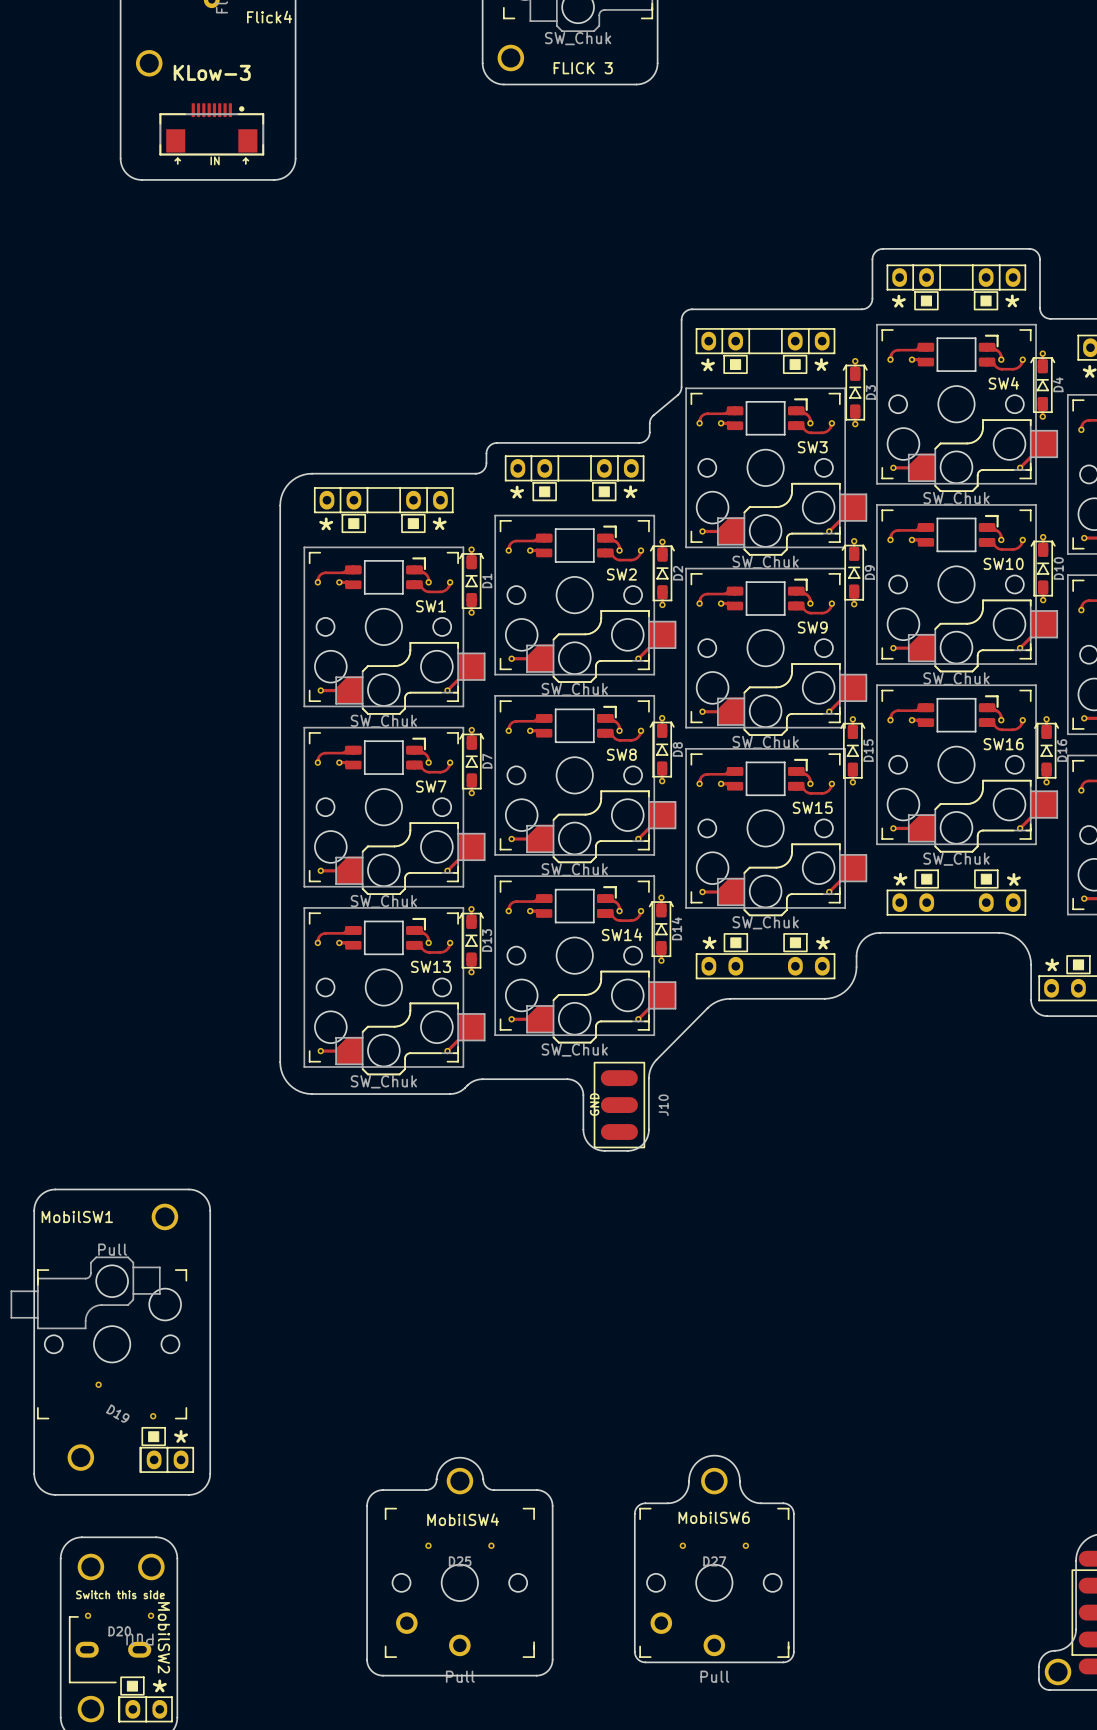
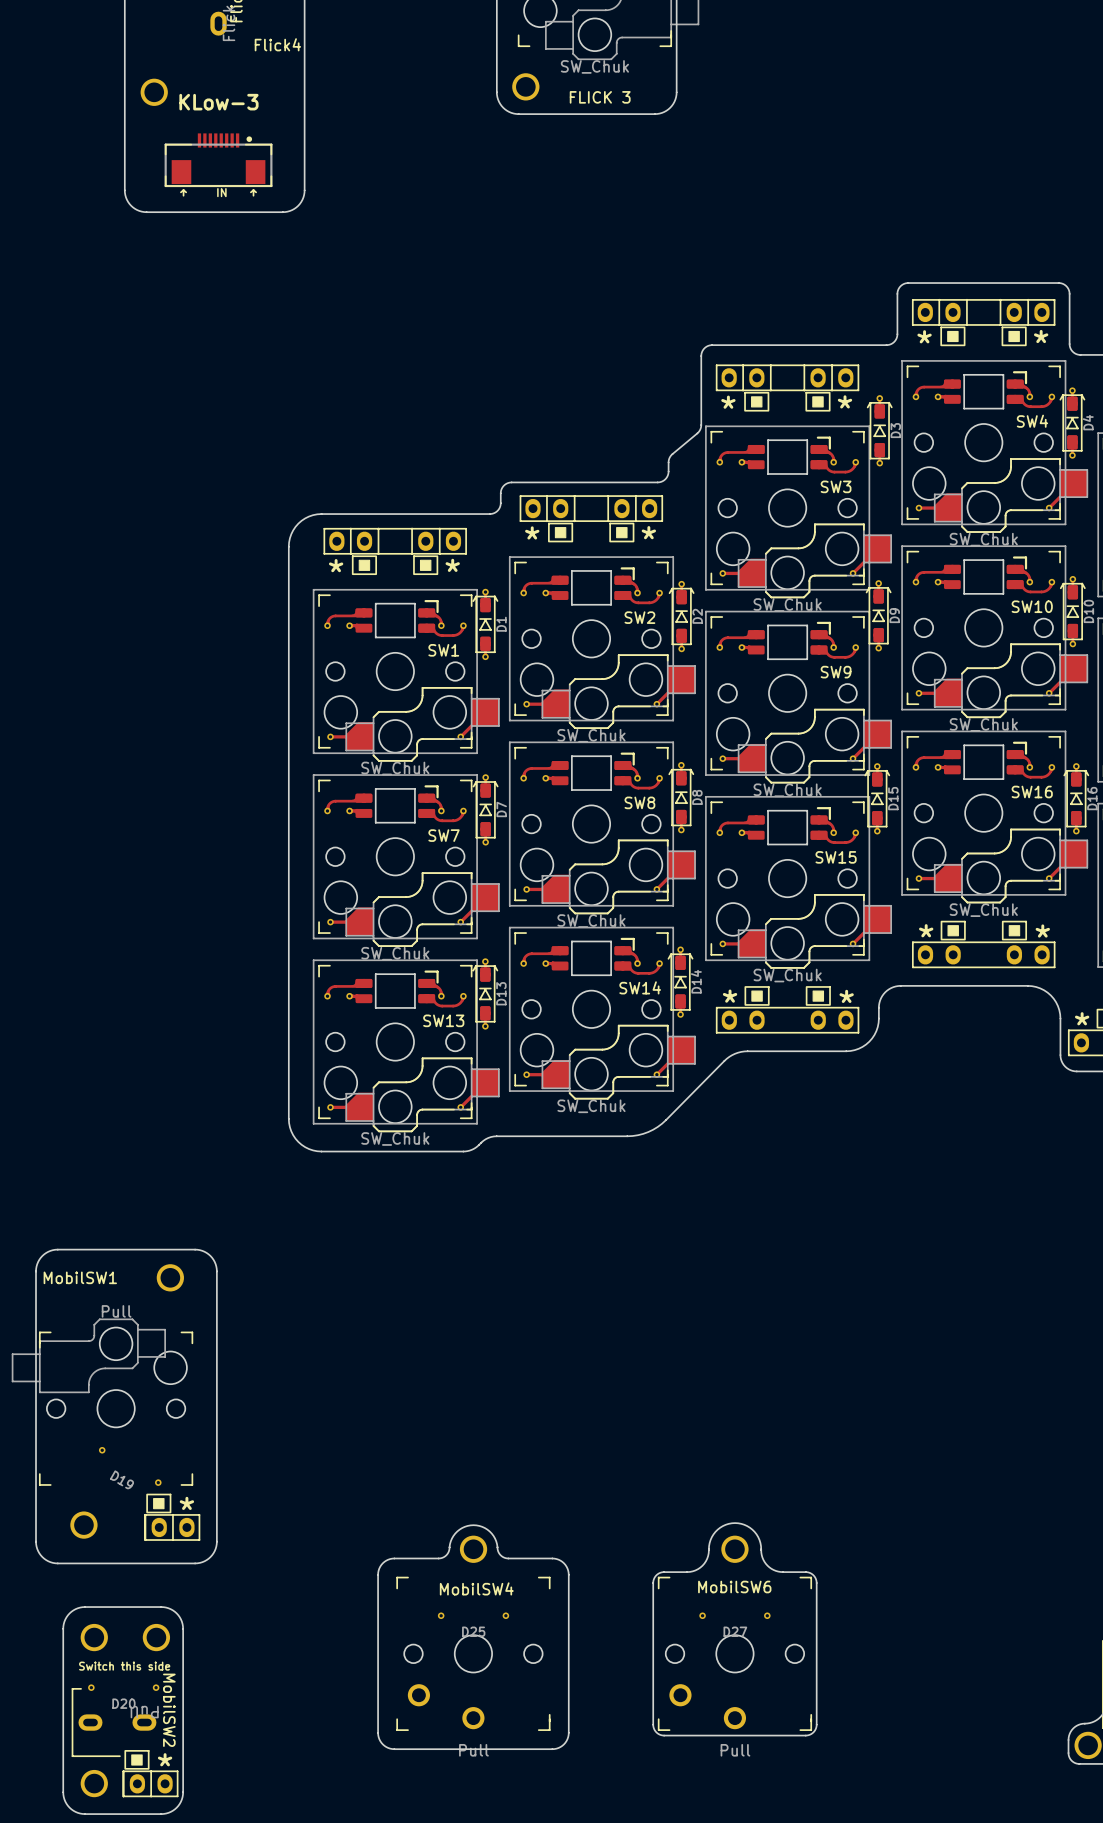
board edge: (879, 932) (867, 936) (860, 943) (856, 953) (854, 979) (847, 989) (836, 996) (824, 998) (727, 998) (709, 1006) (652, 1065) (648, 1078) (648, 1134) (644, 1142) (636, 1148) (630, 1150) (602, 1150) (589, 1144) (583, 1132) (582, 1090) (577, 1082) (567, 1079) -> (905, 985) (893, 987) (883, 994) (879, 1002) (876, 1031) (869, 1041) (858, 1048) (846, 1051) (738, 1052) (726, 1058) (666, 1120) (653, 1129) (632, 1136) (584, 1136)
J10: (619, 1105) -> none

